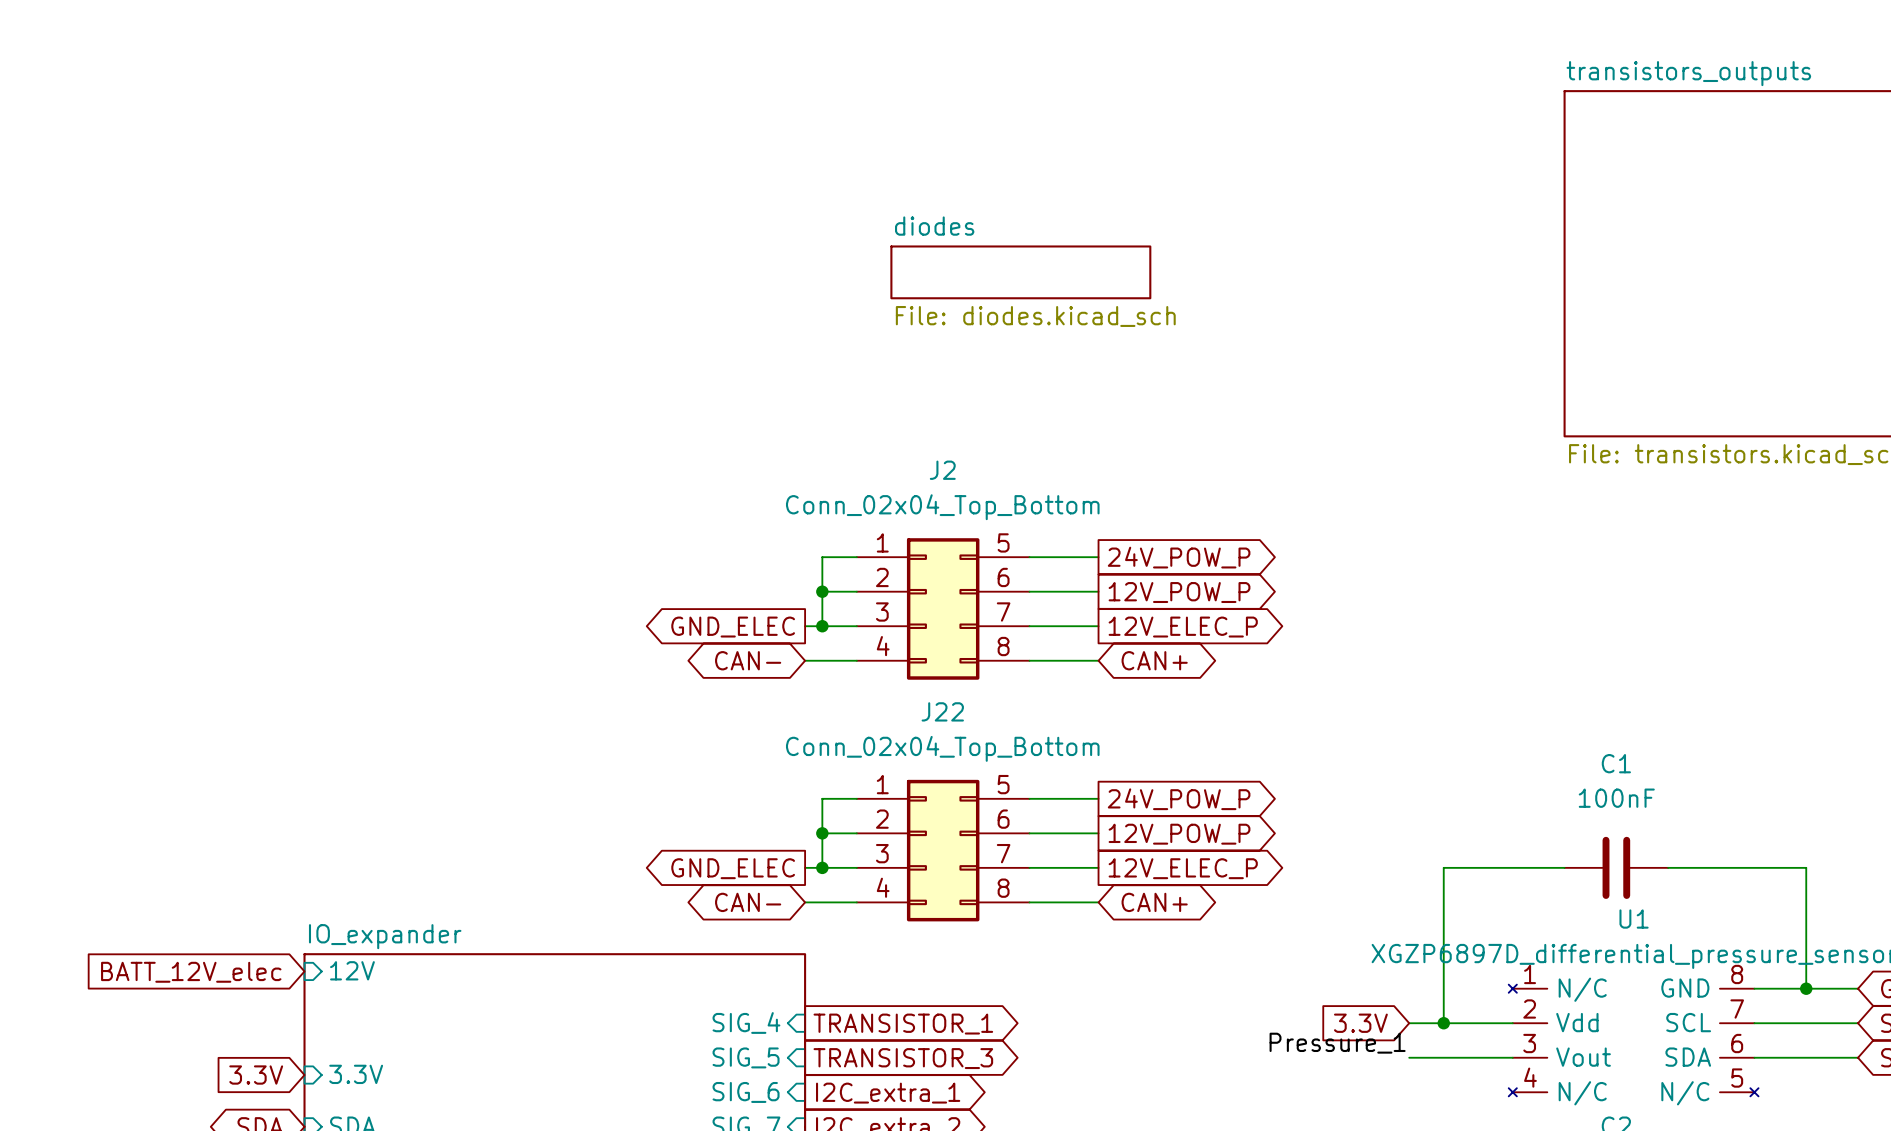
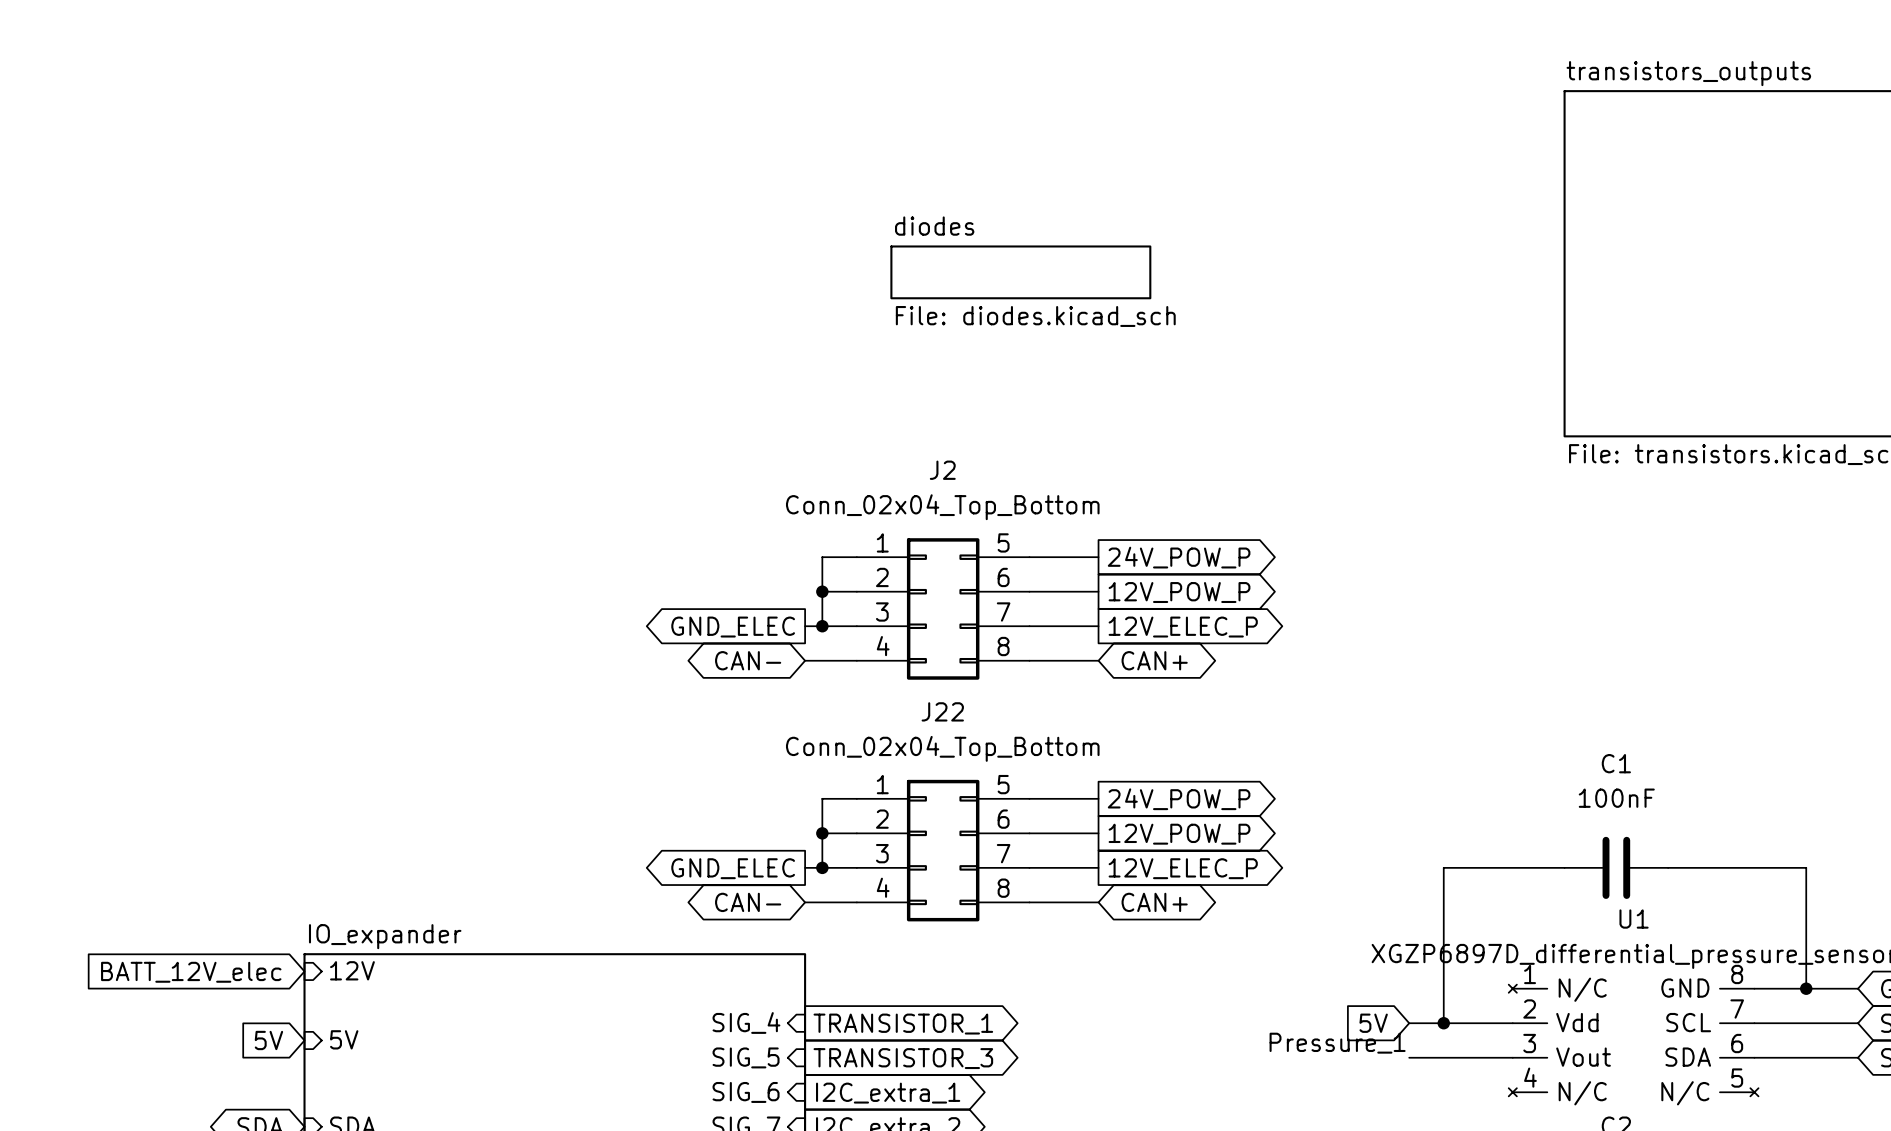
global label: 3.3V (1360, 1023) -> 5V (1373, 1023)
sheet pin: none -> 5V (344, 1039)
global label: none -> 5V (268, 1040)
sheet pin: 3.3V (356, 1074) -> none
global label: 3.3V (256, 1075) -> none

